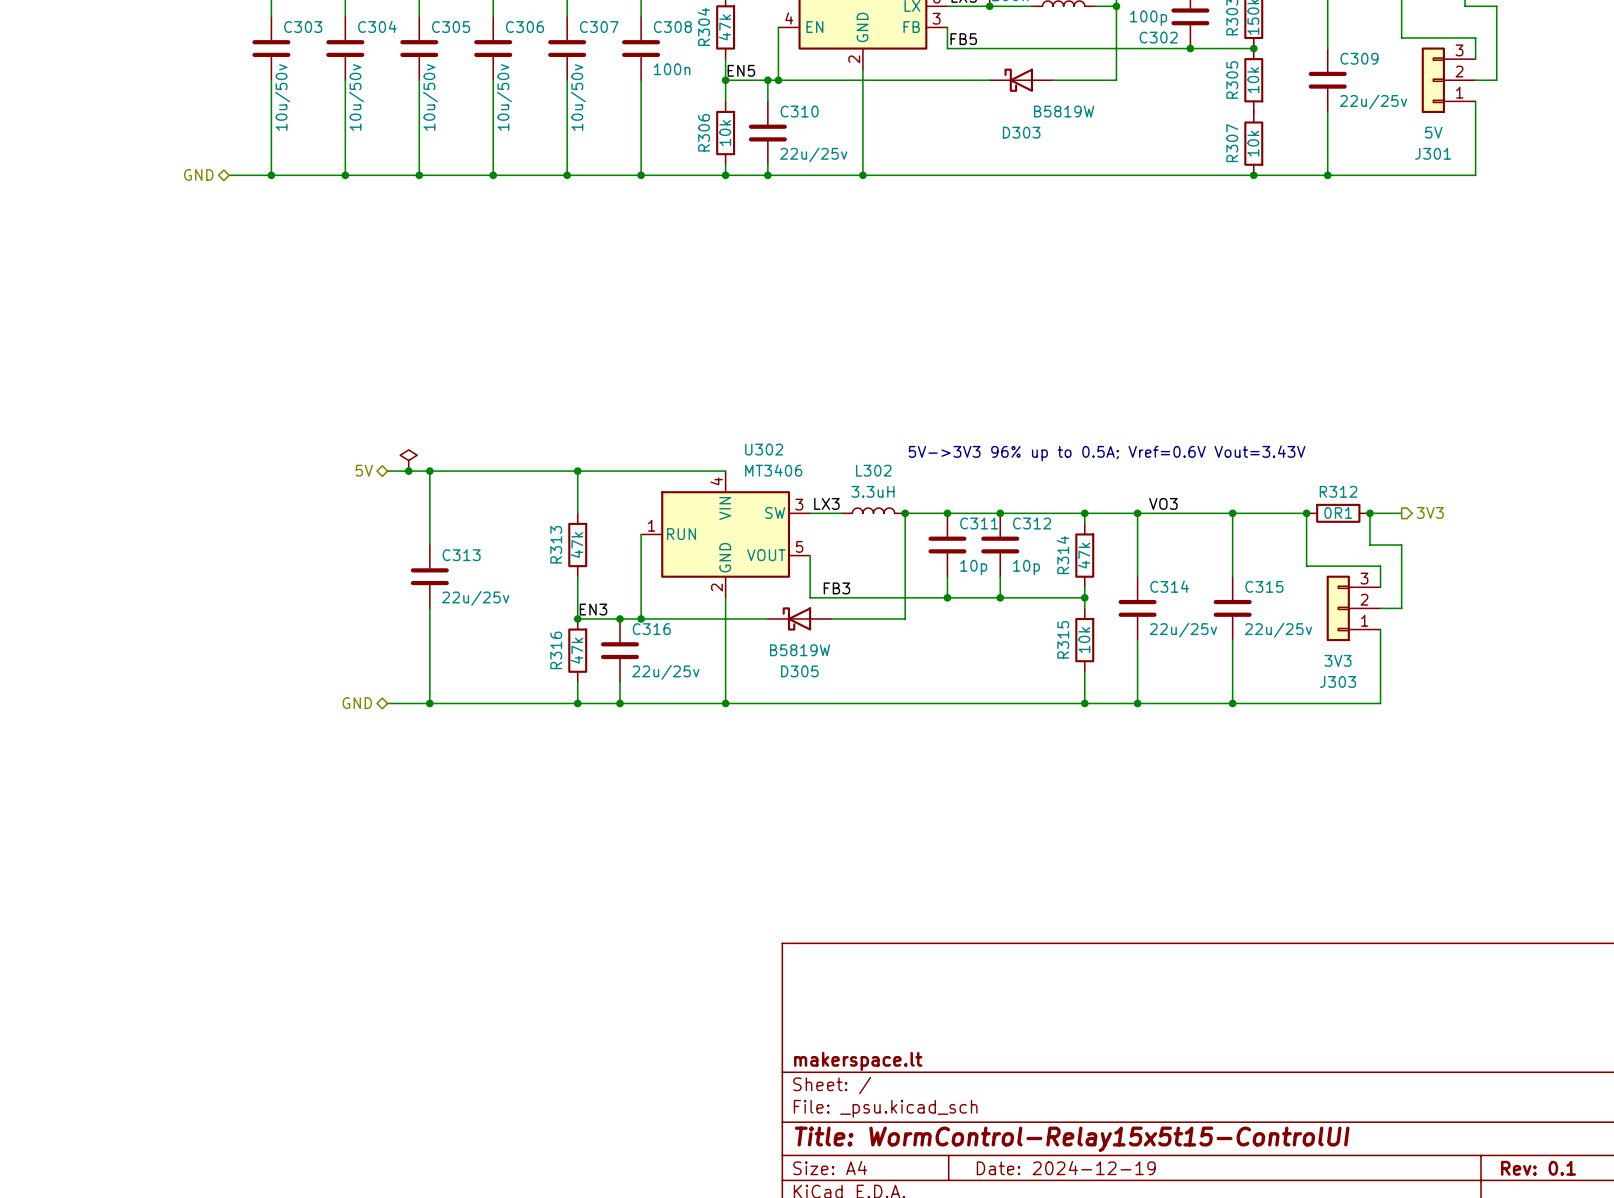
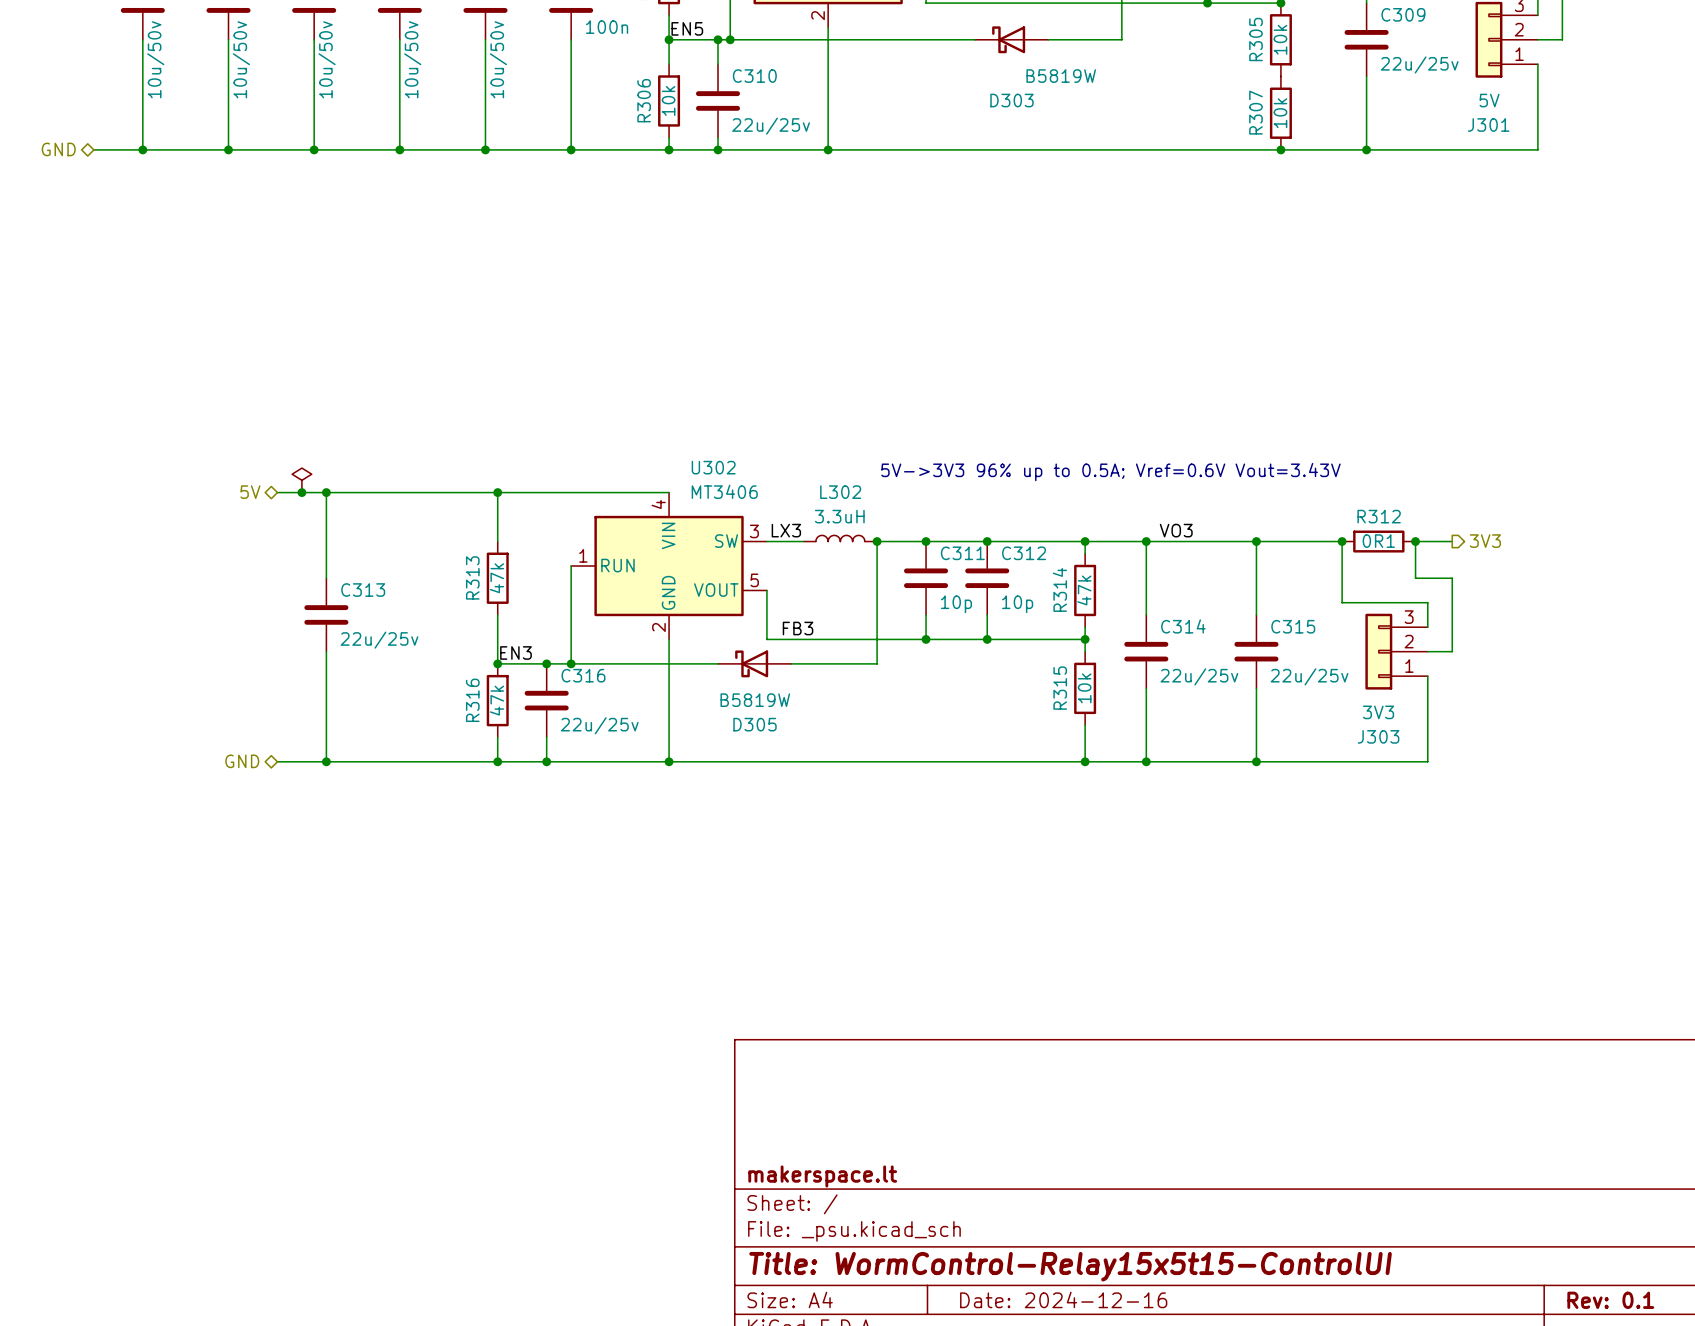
title block: Date: 2024-12-19 (1066, 1167) -> Date: 2024-12-16 (1063, 1299)

